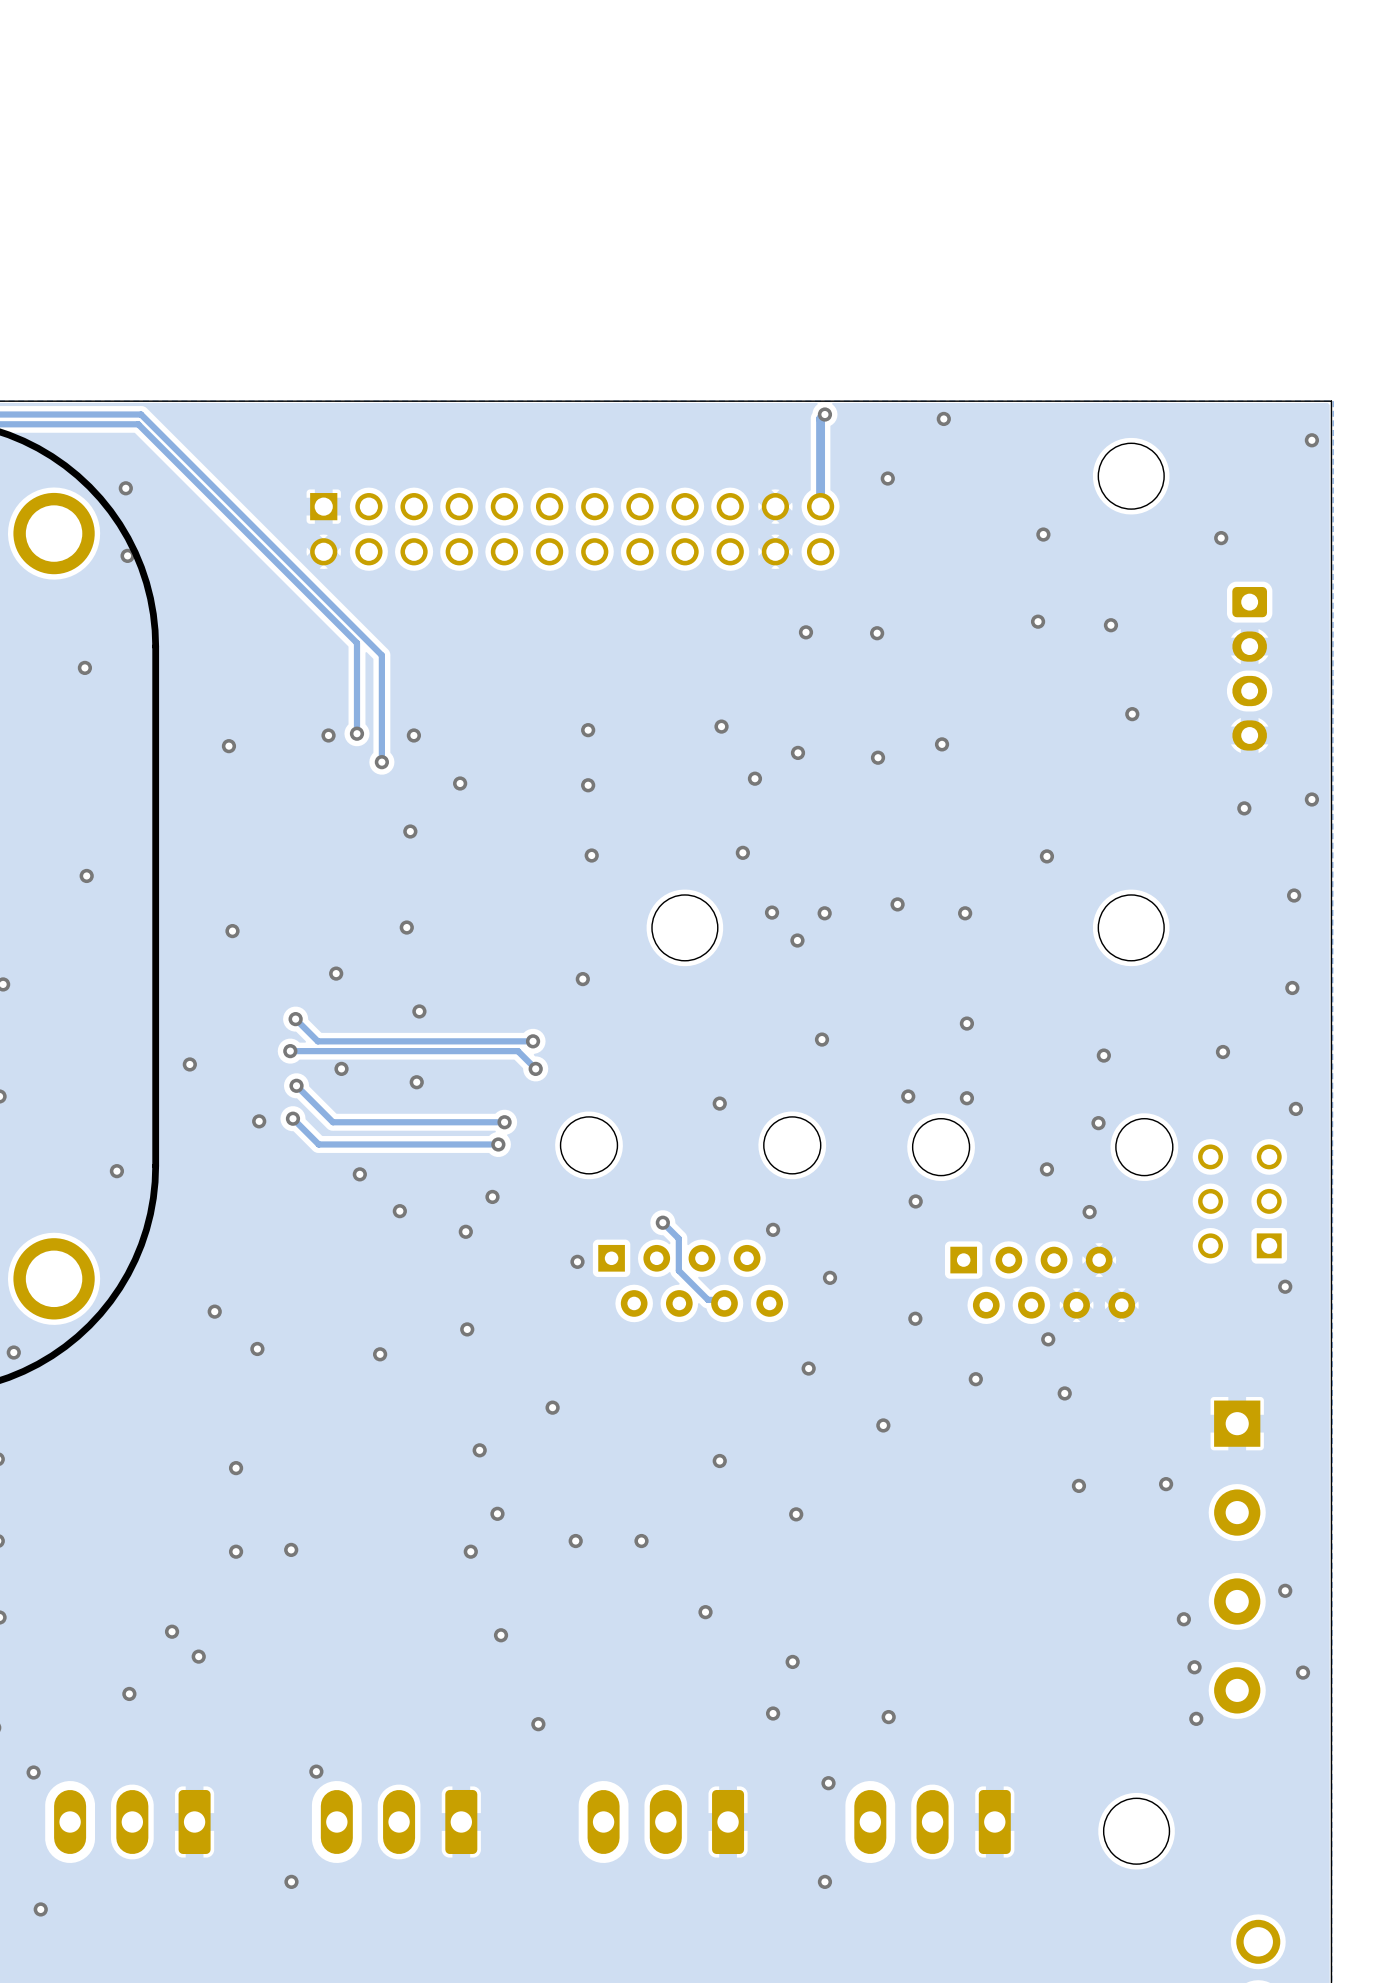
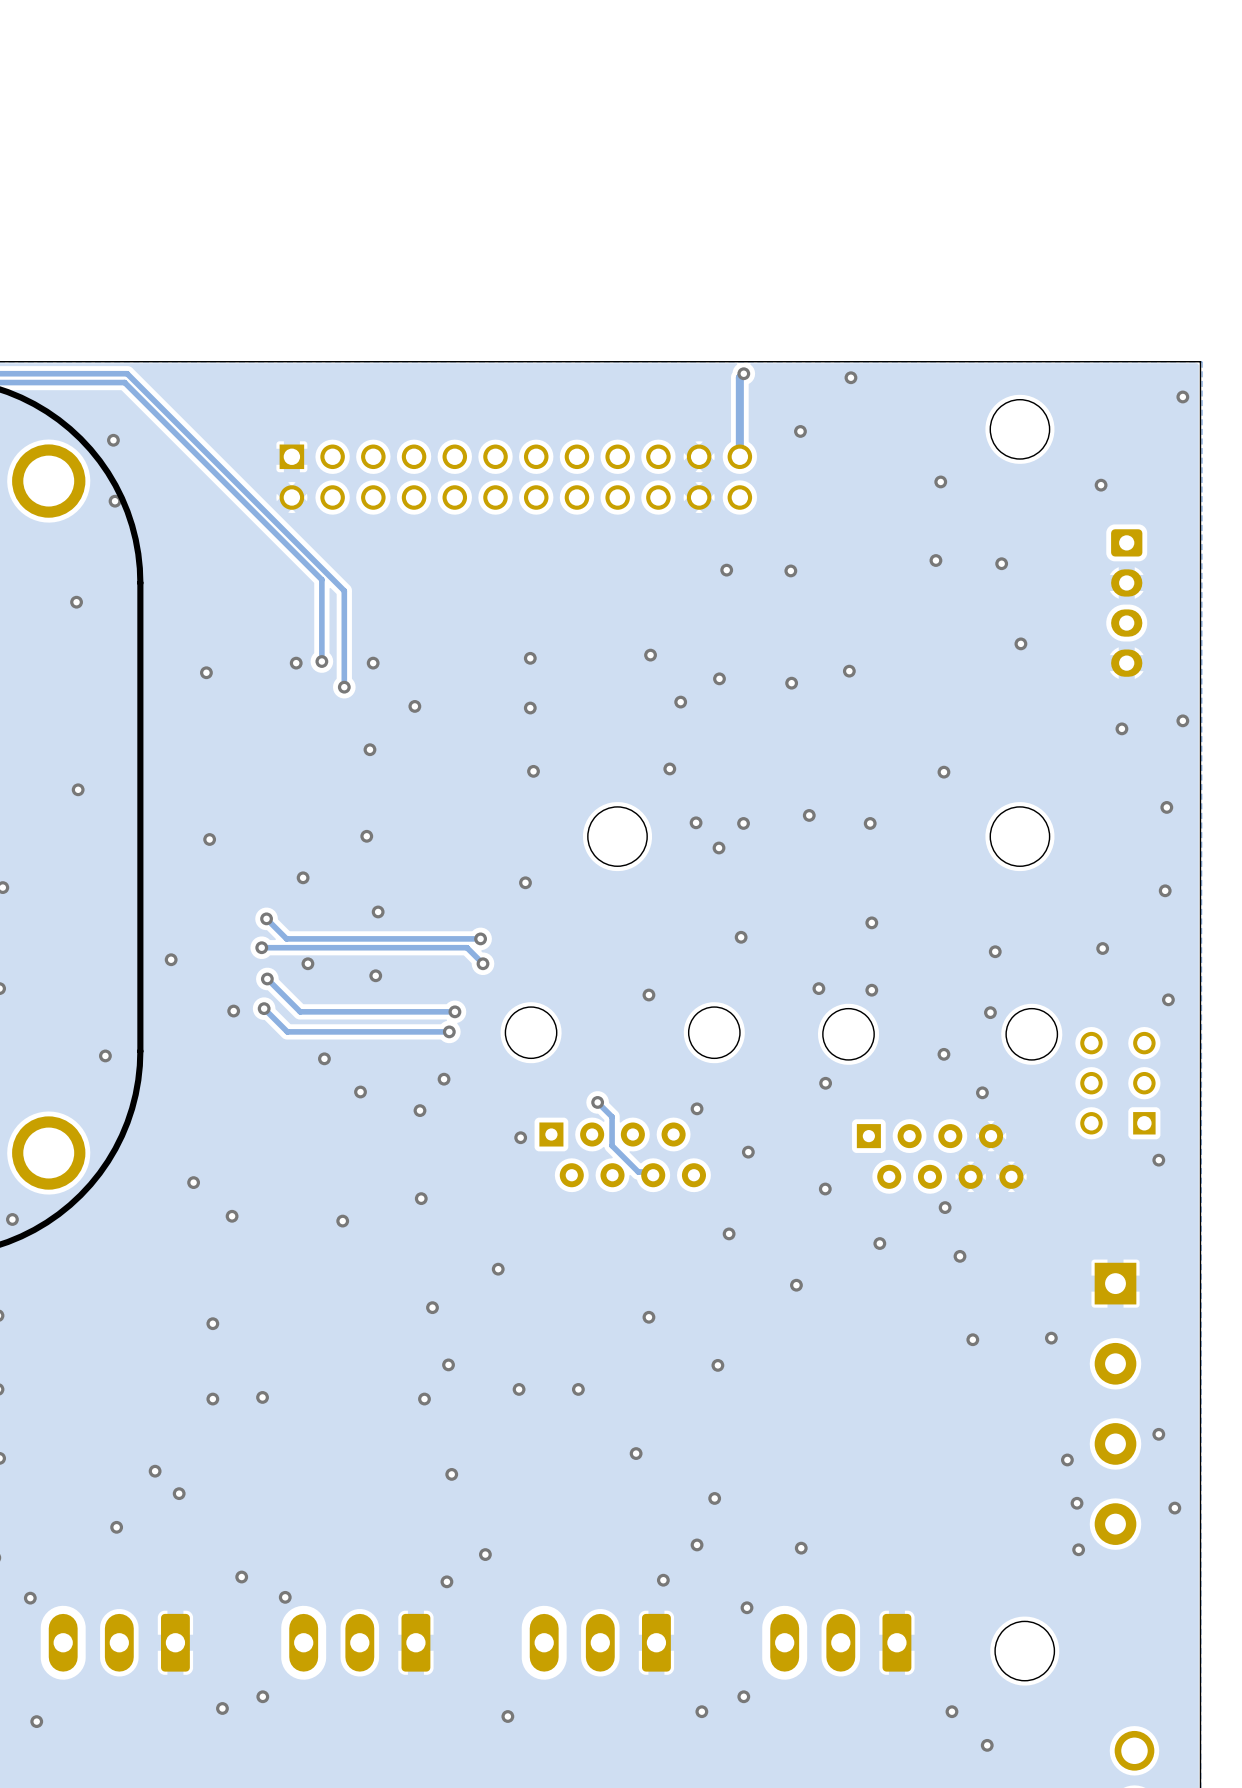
via: none -> (241, 1577)
via: none -> (663, 1580)
via: none -> (446, 1581)
via: none -> (222, 1708)
via: none -> (701, 1711)
via: none -> (951, 1711)
via: none -> (507, 1716)
via: none -> (987, 1745)

